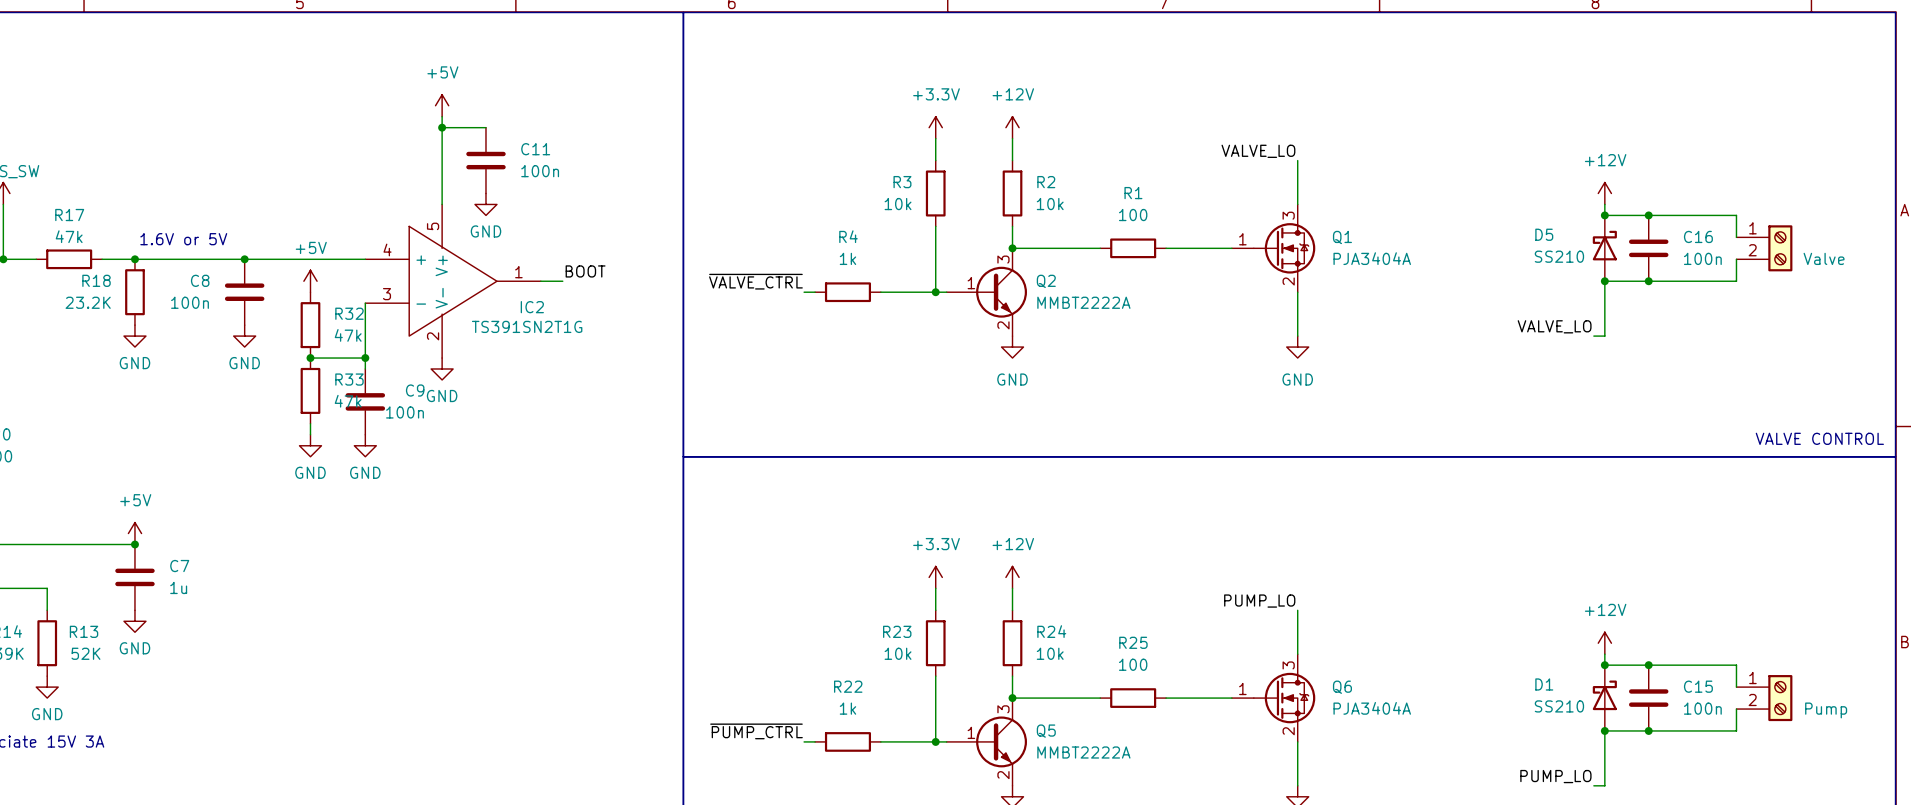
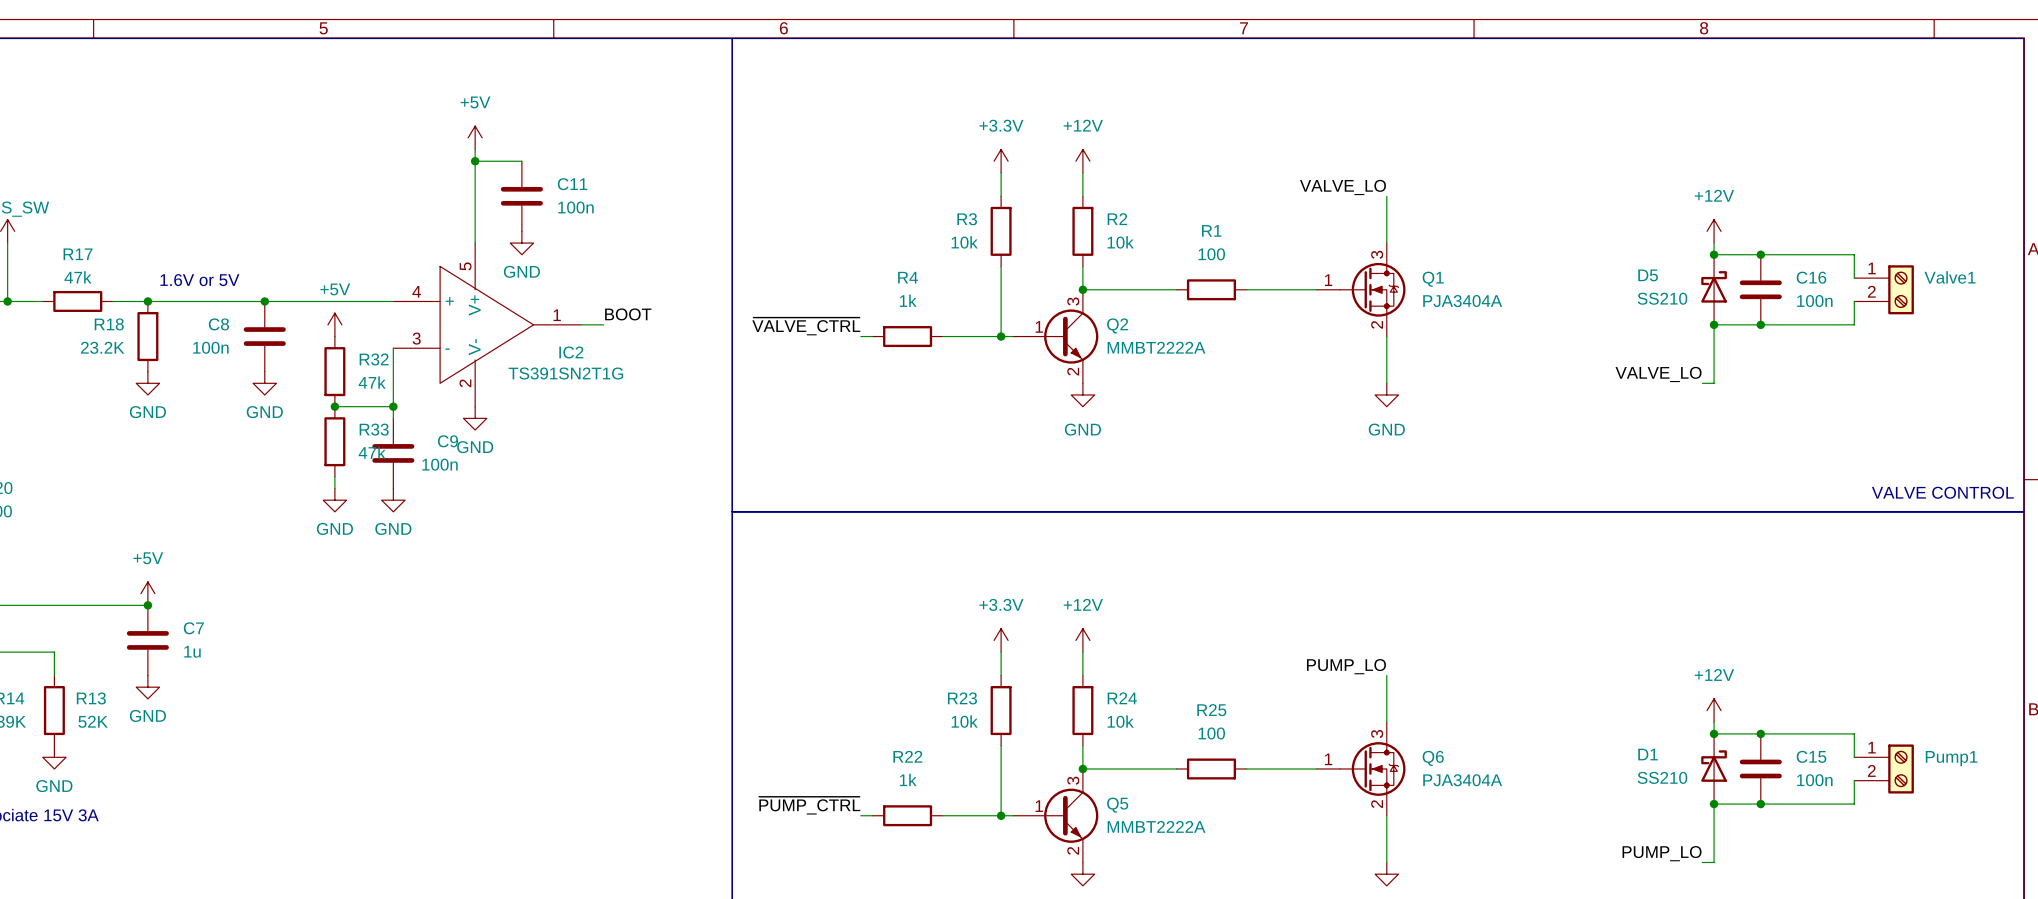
Valve1 name: none -> Valve1 (1950, 277)
Valve1 value: Valve (1824, 258) -> none
Pump1 name: none -> Pump1 (1951, 758)
Pump1 value: Pump (1826, 710) -> none

